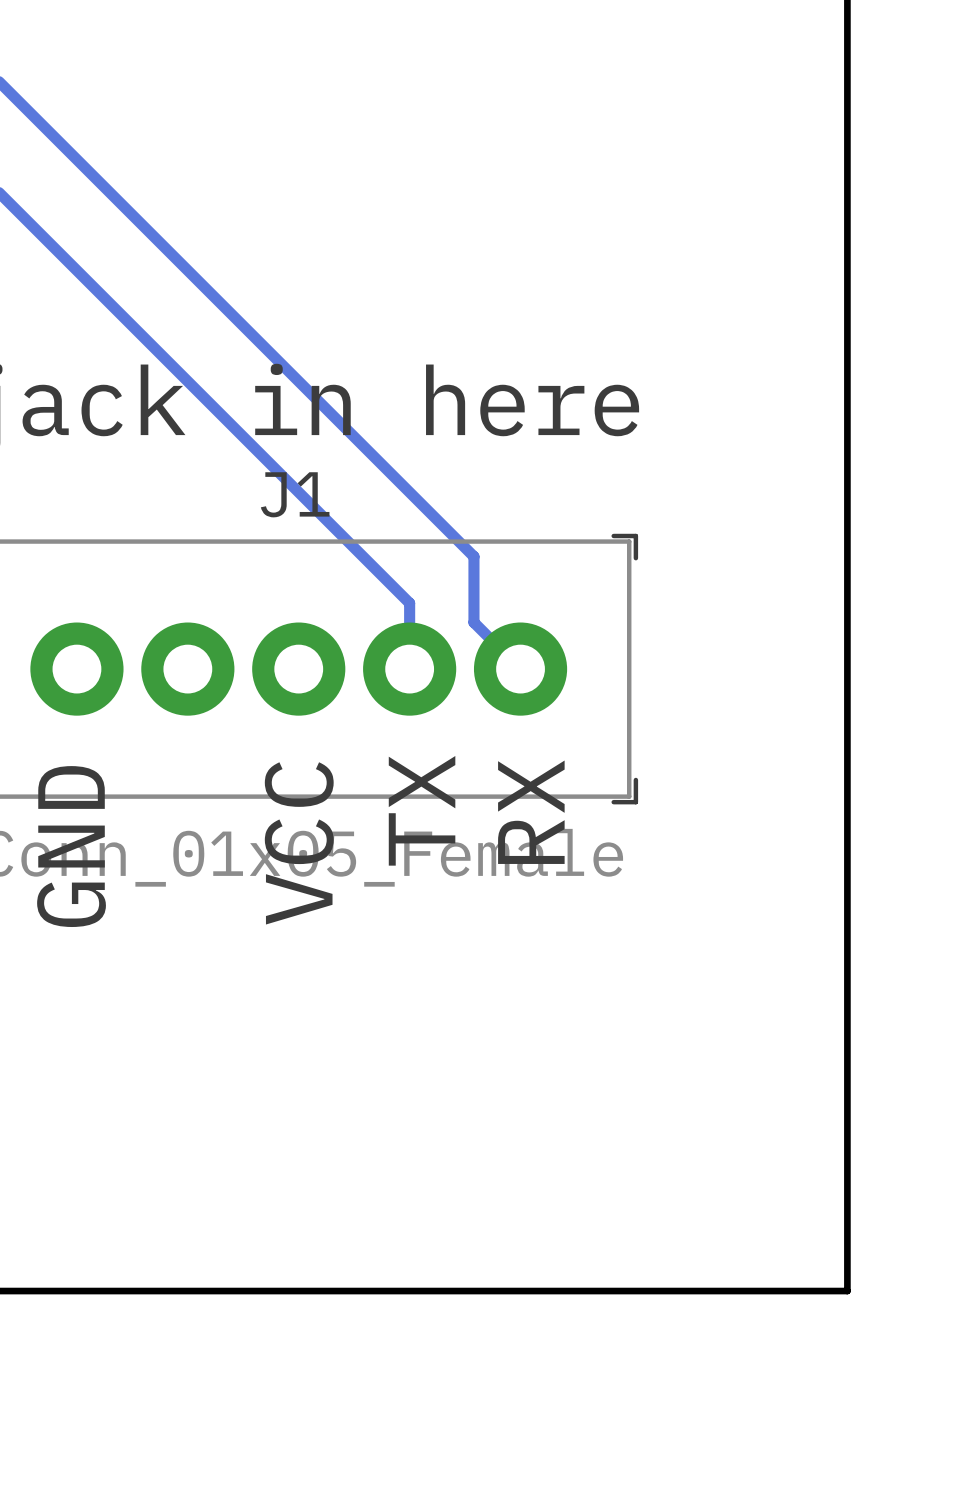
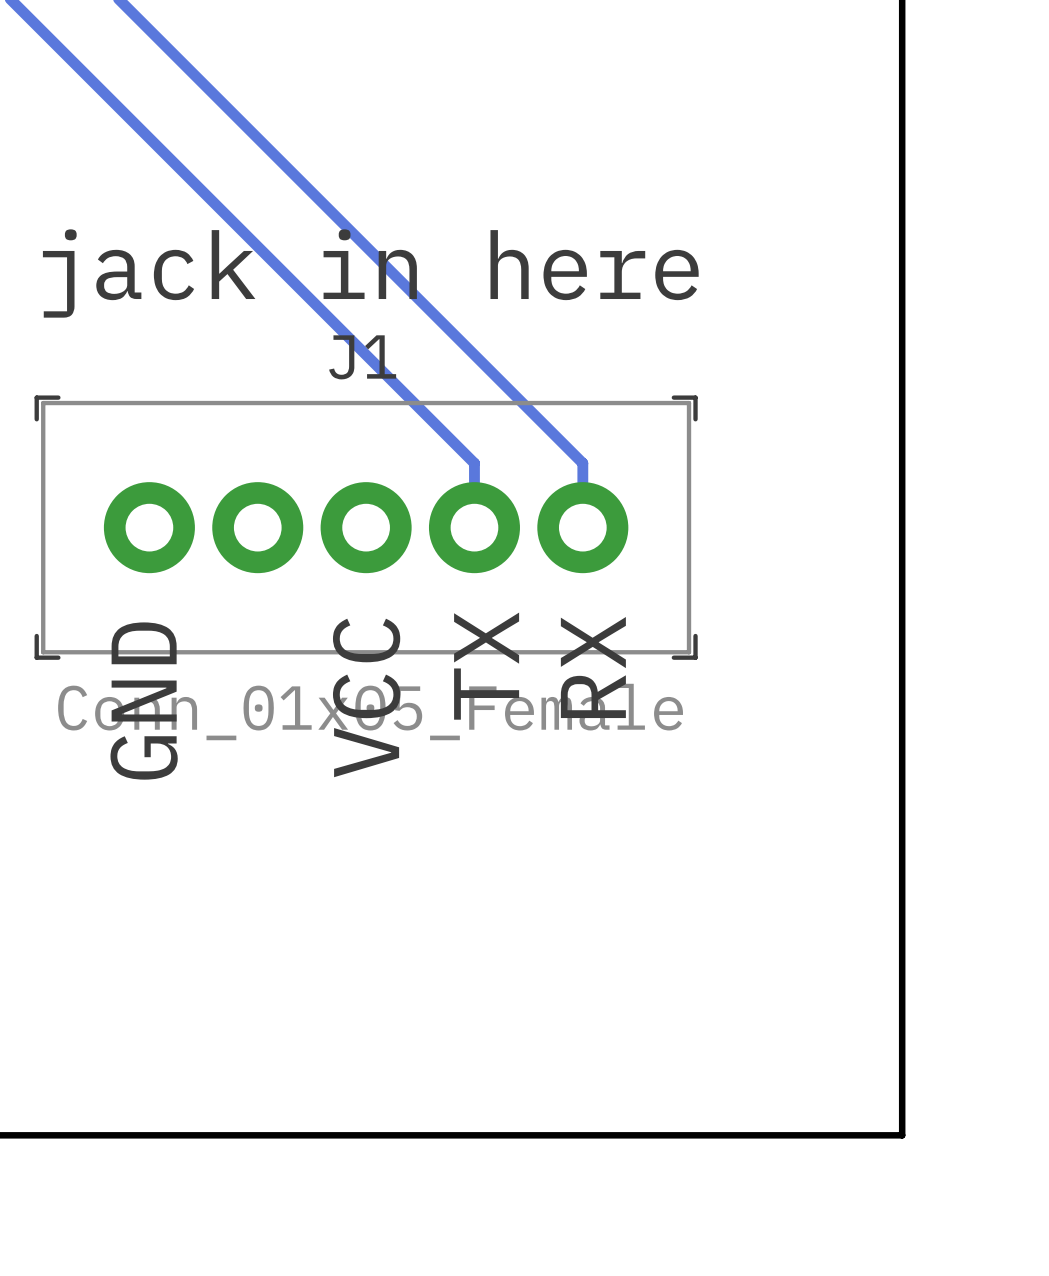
bottom track: (473, 556) (473, 622) (520, 669) -> (537, 417) (582, 463) (582, 527)

